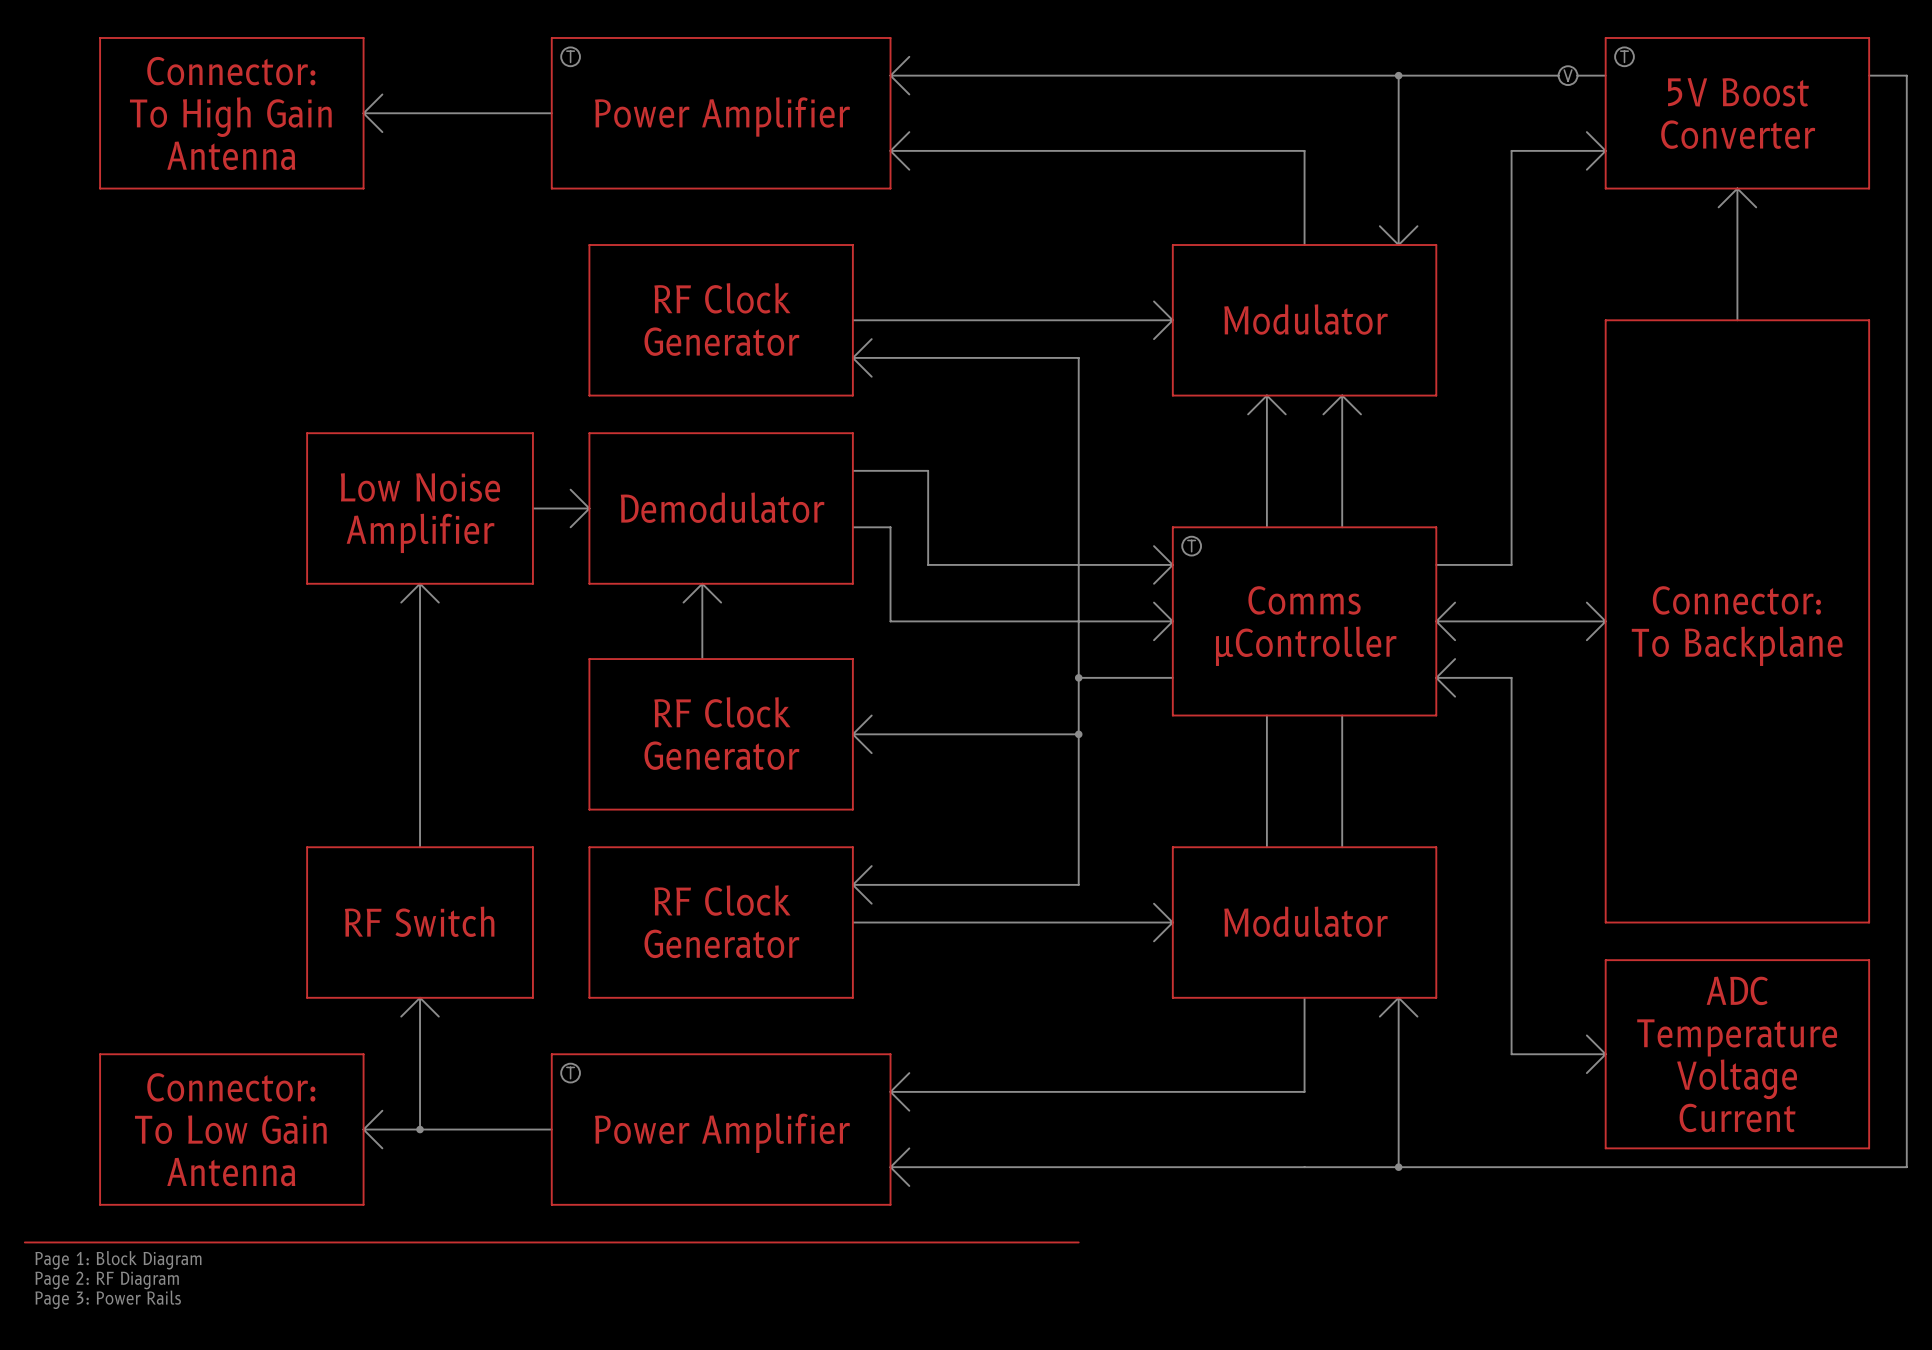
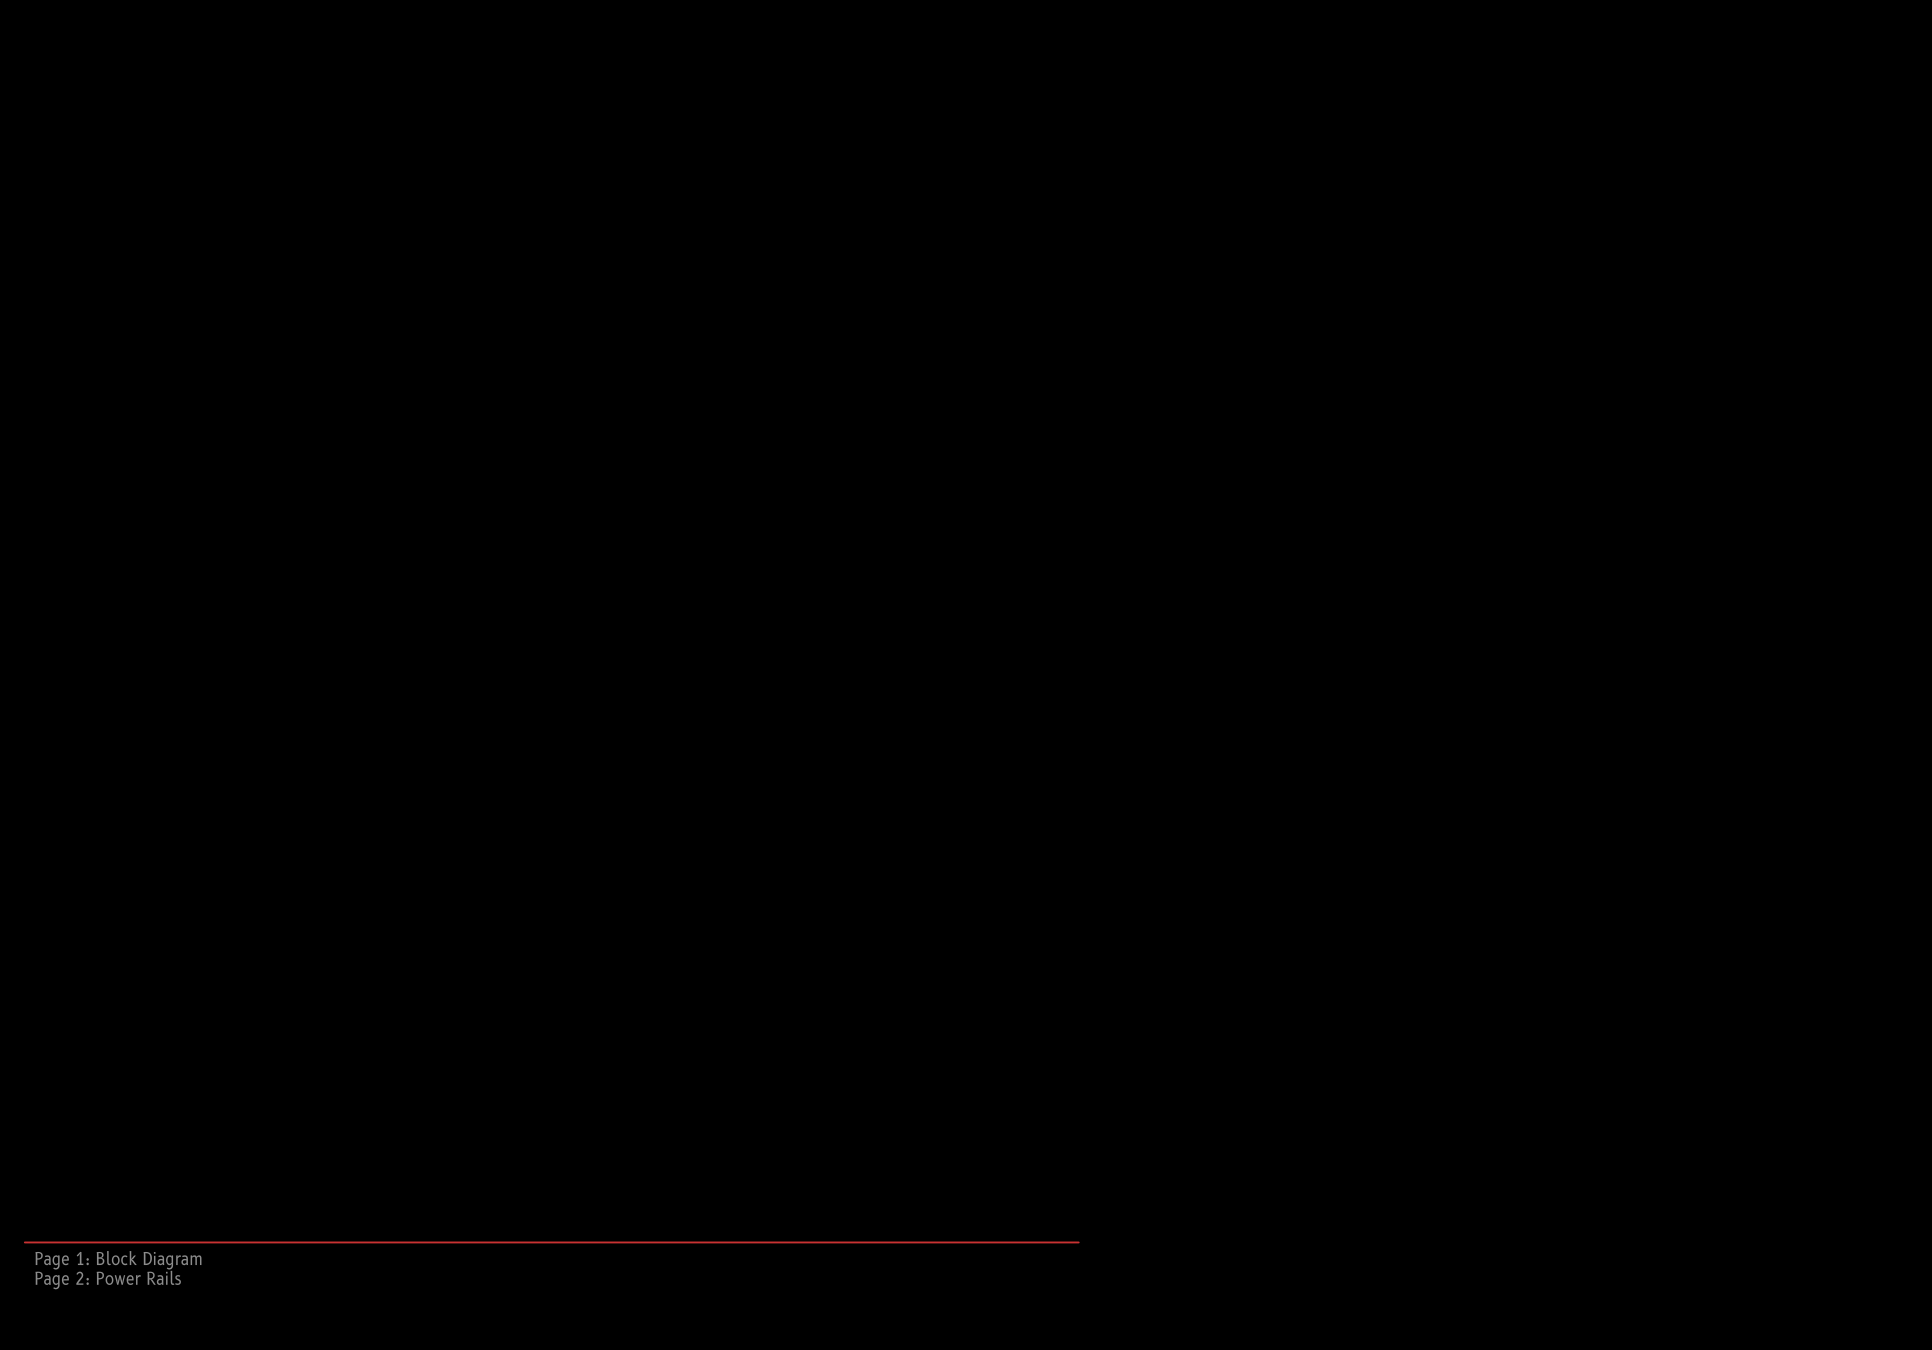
line: (100, 37) (363, 37) (363, 188) (100, 188) (100, 37) -> none
line: (551, 37) (890, 37) (890, 188) (551, 188) (551, 37) -> none
line: (1605, 37) (1605, 188) (1869, 188) (1869, 37) (1605, 37) -> none
part: (570, 56) -> none
line: (909, 56) (890, 75) -> none
part: (1624, 56) -> none
text: Connector: (231, 71) -> none
line: (890, 75) (1558, 75) -> none
line: (890, 75) (909, 94) -> none
line: (1398, 75) (1398, 245) -> none
part: (1398, 75) -> none
part: (1568, 75) -> none
line: (1577, 75) (1605, 75) -> none
line: (1869, 75) (1906, 75) (1906, 1167) (890, 1167) -> none
text: 5V Boost (1738, 92) -> none
line: (382, 94) (363, 113) -> none
line: (363, 113) (551, 113) -> none
line: (363, 113) (382, 132) -> none
text: Power Amplifier (722, 116) -> none
text: To High Gain (230, 117) -> none
line: (909, 132) (890, 150) -> none
line: (1586, 132) (1605, 150) -> none
text: Converter (1738, 134) -> none
line: (890, 150) (1304, 150) (1304, 245) -> none
line: (890, 150) (909, 169) -> none
line: (1605, 150) (1511, 150) (1511, 564) (1436, 564) -> none
line: (1605, 150) (1586, 169) -> none
text: Antenna (231, 155) -> none
line: (1737, 188) (1737, 320) -> none
line: (1737, 188) (1718, 207) -> none
line: (1737, 188) (1756, 207) -> none
line: (1379, 226) (1398, 245) -> none
line: (1417, 226) (1398, 245) -> none
line: (589, 245) (852, 245) (852, 395) (589, 395) (589, 245) -> none
line: (1172, 245) (1172, 395) (1436, 395) (1436, 245) (1172, 245) -> none
text: RF Clock (722, 298) -> none
line: (1154, 301) (1172, 320) -> none
text: Modulator (1305, 319) -> none
line: (852, 320) (1172, 320) -> none
line: (1172, 320) (1154, 339) -> none
line: (1605, 320) (1605, 922) (1869, 922) (1869, 320) (1605, 320) -> none
line: (871, 339) (852, 357) -> none
text: Generator (721, 341) -> none
line: (852, 357) (1078, 357) (1078, 884) (852, 884) -> none
line: (852, 357) (871, 376) -> none
line: (1266, 395) (1266, 527) -> none
line: (1266, 395) (1248, 414) -> none
line: (1266, 395) (1285, 414) -> none
line: (1342, 395) (1342, 527) -> none
line: (1342, 395) (1323, 414) -> none
line: (1342, 395) (1361, 414) -> none
line: (307, 433) (532, 433) (532, 583) (307, 583) (307, 433) -> none
line: (589, 433) (589, 583) (852, 583) (852, 433) (589, 433) -> none
line: (852, 470) (928, 470) (928, 564) (1172, 564) -> none
text: Low Noise (420, 487) -> none
line: (570, 489) (589, 508) -> none
text: Demodulator (722, 507) -> none
line: (532, 508) (589, 508) -> none
line: (589, 508) (570, 527) -> none
line: (852, 527) (890, 527) (890, 621) (1172, 621) -> none
line: (1172, 527) (1436, 527) (1436, 715) (1172, 715) (1172, 527) -> none
text: Amplifier (420, 533) -> none
line: (1154, 546) (1172, 564) -> none
part: (1191, 546) -> none
line: (1172, 564) (1154, 583) -> none
line: (420, 583) (420, 847) -> none
line: (420, 583) (401, 602) -> none
line: (420, 583) (438, 602) -> none
line: (702, 583) (702, 659) -> none
line: (702, 583) (683, 602) -> none
line: (702, 583) (721, 602) -> none
text: Comms (1304, 600) -> none
text: Connector: (1736, 600) -> none
line: (1154, 602) (1172, 621) -> none
line: (1455, 602) (1436, 621) -> none
line: (1586, 602) (1605, 621) -> none
line: (1172, 621) (1154, 640) -> none
line: (1436, 621) (1455, 640) -> none
line: (1436, 621) (1605, 621) -> none
line: (1605, 621) (1586, 640) -> none
text: µController (1306, 646) -> none
text: To Backplane (1737, 646) -> none
line: (589, 659) (589, 809) (852, 809) (852, 659) (589, 659) -> none
line: (1455, 659) (1436, 677) -> none
line: (1078, 677) (1172, 677) -> none
part: (1078, 677) -> none
line: (1436, 677) (1511, 677) (1511, 1054) (1605, 1054) -> none
line: (1436, 677) (1455, 696) -> none
text: RF Clock (722, 712) -> none
line: (871, 715) (852, 734) -> none
line: (1266, 715) (1266, 847) -> none
line: (1342, 715) (1342, 847) -> none
line: (852, 734) (871, 753) -> none
line: (852, 734) (1078, 734) -> none
part: (1078, 734) -> none
text: Generator (721, 755) -> none
line: (307, 847) (532, 847) (532, 997) (307, 997) (307, 847) -> none
line: (589, 847) (589, 997) (852, 997) (852, 847) (589, 847) -> none
line: (1172, 847) (1172, 997) (1436, 997) (1436, 847) (1172, 847) -> none
line: (871, 866) (852, 884) -> none
line: (852, 884) (871, 903) -> none
text: RF Clock (722, 900) -> none
line: (1154, 903) (1172, 922) -> none
text: RF Switch (419, 921) -> none
text: Modulator (1305, 921) -> none
line: (852, 922) (1172, 922) -> none
line: (1172, 922) (1154, 941) -> none
text: Generator (721, 943) -> none
line: (1605, 960) (1605, 1148) (1869, 1148) (1869, 960) (1605, 960) -> none
text: ADC (1737, 990) -> none
line: (420, 997) (420, 1129) -> none
line: (420, 997) (401, 1016) -> none
line: (420, 997) (438, 1016) -> none
line: (1304, 997) (1304, 1091) (890, 1091) -> none
line: (1398, 997) (1398, 1167) -> none
line: (1398, 997) (1417, 1016) -> none
line: (1398, 997) (1379, 1016) -> none
line: (1586, 1035) (1605, 1054) -> none
text: Temperature (1737, 1037) -> none
line: (100, 1054) (100, 1204) (363, 1204) (363, 1054) (100, 1054) -> none
line: (551, 1054) (551, 1204) (890, 1204) (890, 1054) (551, 1054) -> none
line: (1605, 1054) (1586, 1073) -> none
part: (570, 1073) -> none
line: (909, 1073) (890, 1091) -> none
text: Voltage (1737, 1079) -> none
text: Connector: (231, 1087) -> none
line: (890, 1091) (909, 1110) -> none
line: (382, 1110) (363, 1129) -> none
text: Current (1737, 1117) -> none
text: To Low Gain (230, 1129) -> none
line: (363, 1129) (551, 1129) -> none
line: (363, 1129) (382, 1148) -> none
part: (420, 1129) -> none
text: Power Amplifier (722, 1133) -> none
line: (909, 1148) (890, 1167) -> none
line: (890, 1167) (909, 1186) -> none
part: (1398, 1167) -> none
text: Antenna (231, 1172) -> none
text: Page 2: RF Diagram (107, 1280) -> Page 2: Power Rails (108, 1280)
text: Page 3: Power Rails (108, 1299) -> none

